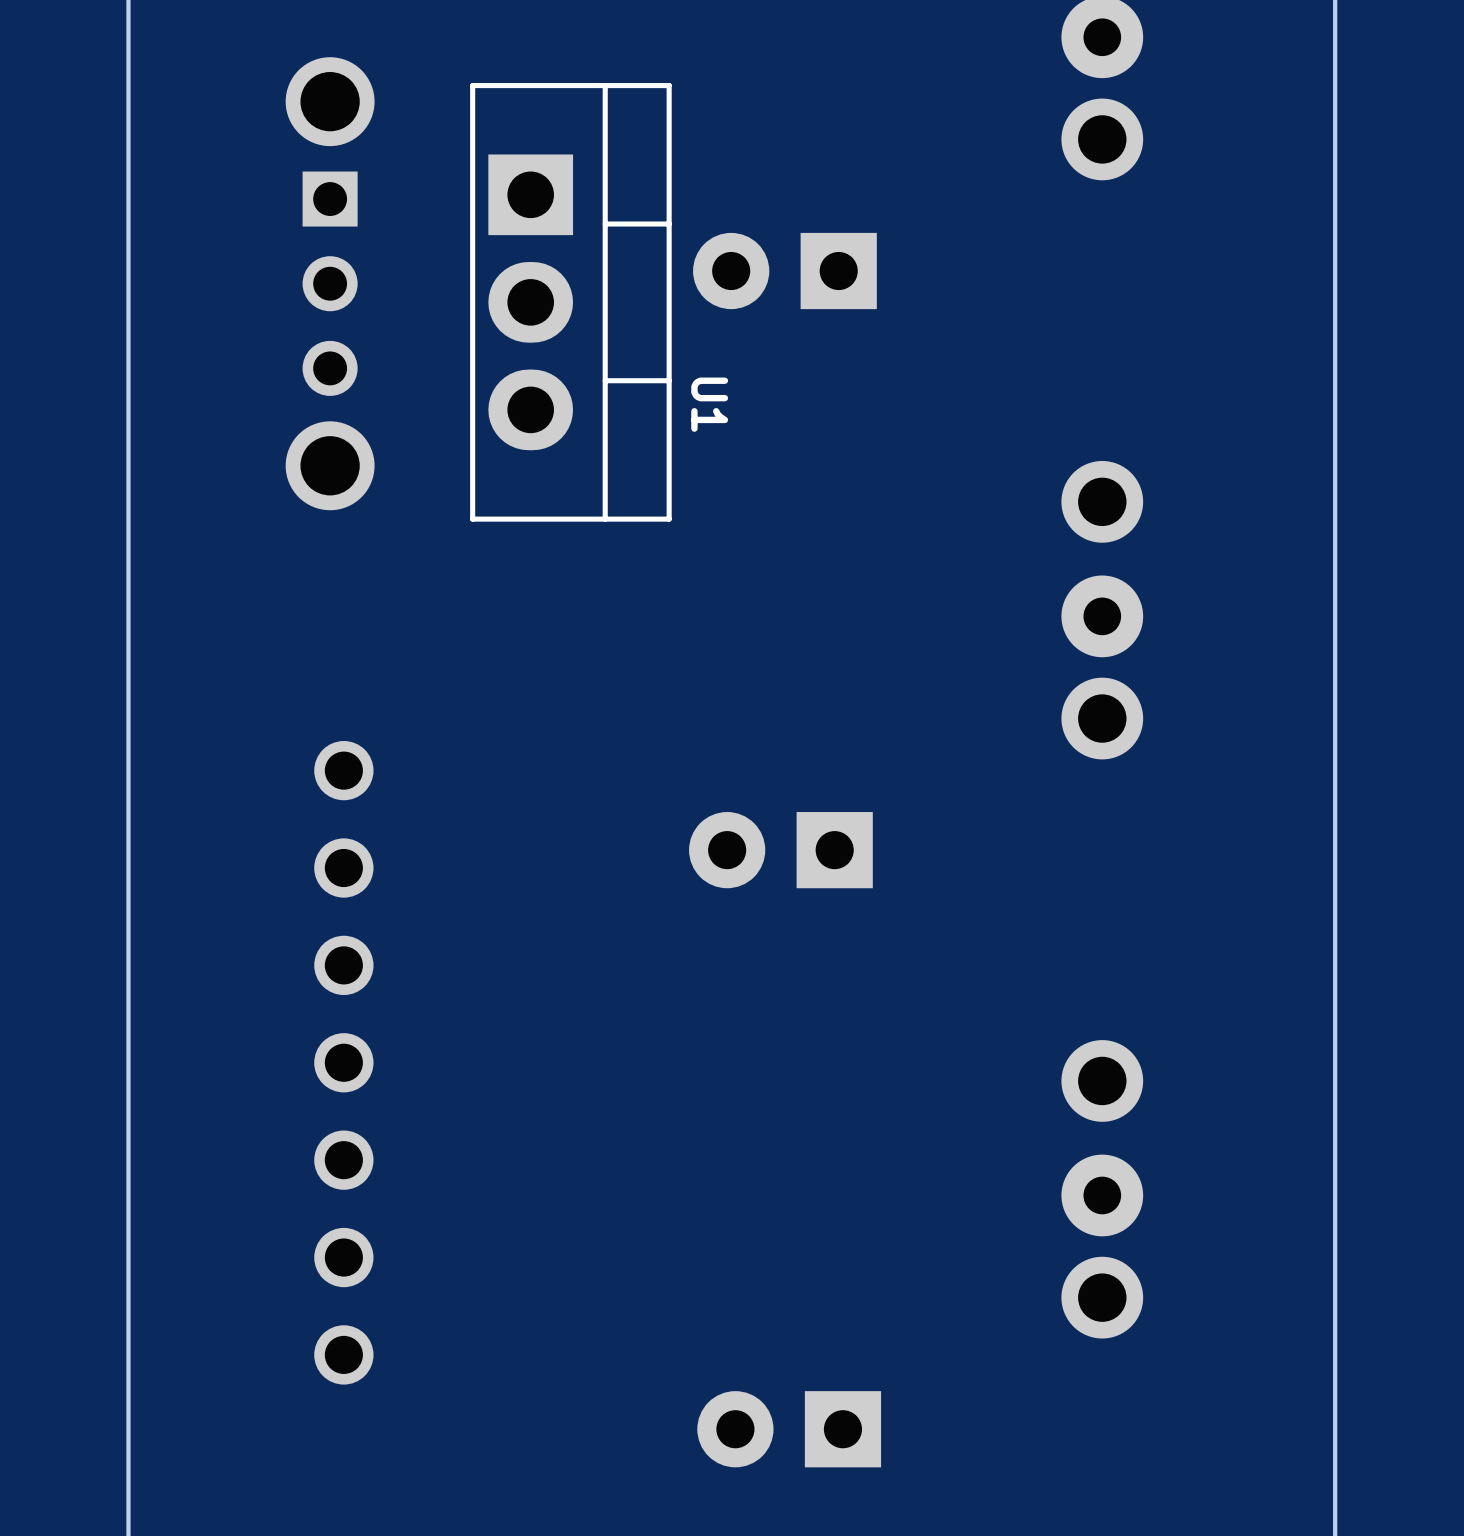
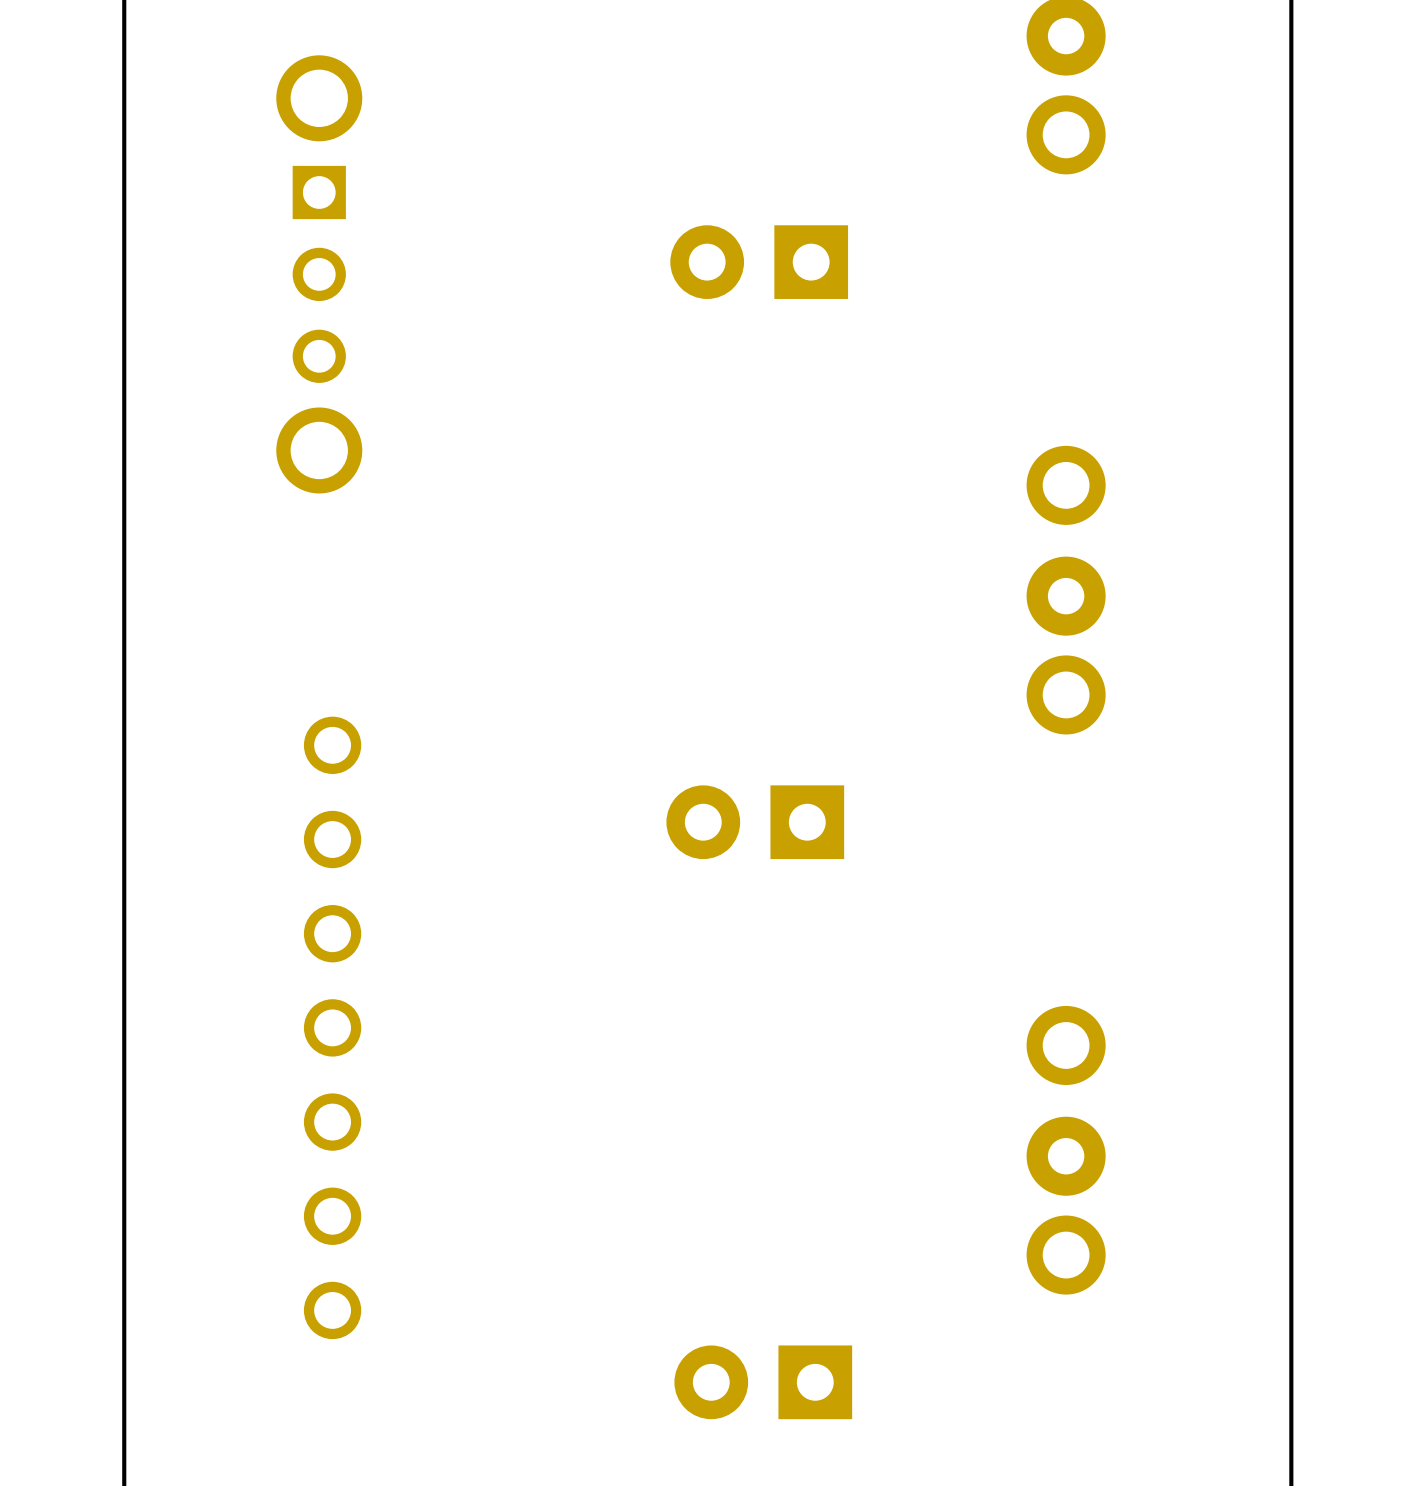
U1: (570, 302) -> none

